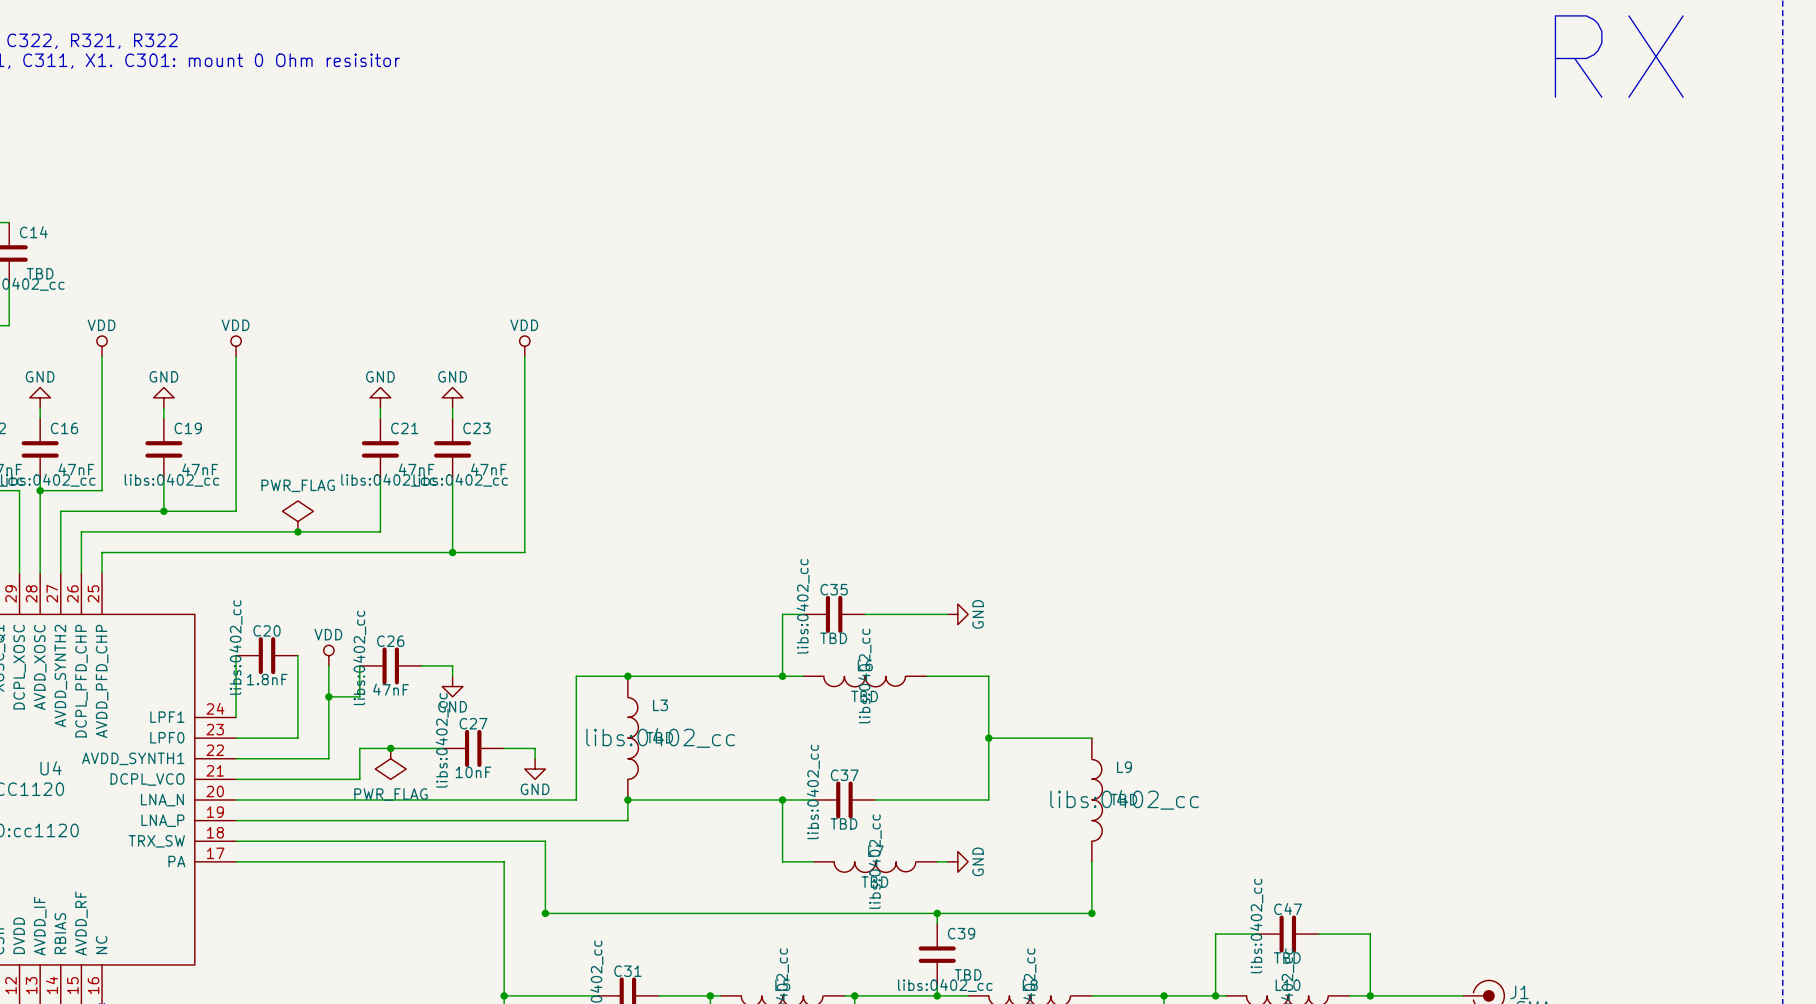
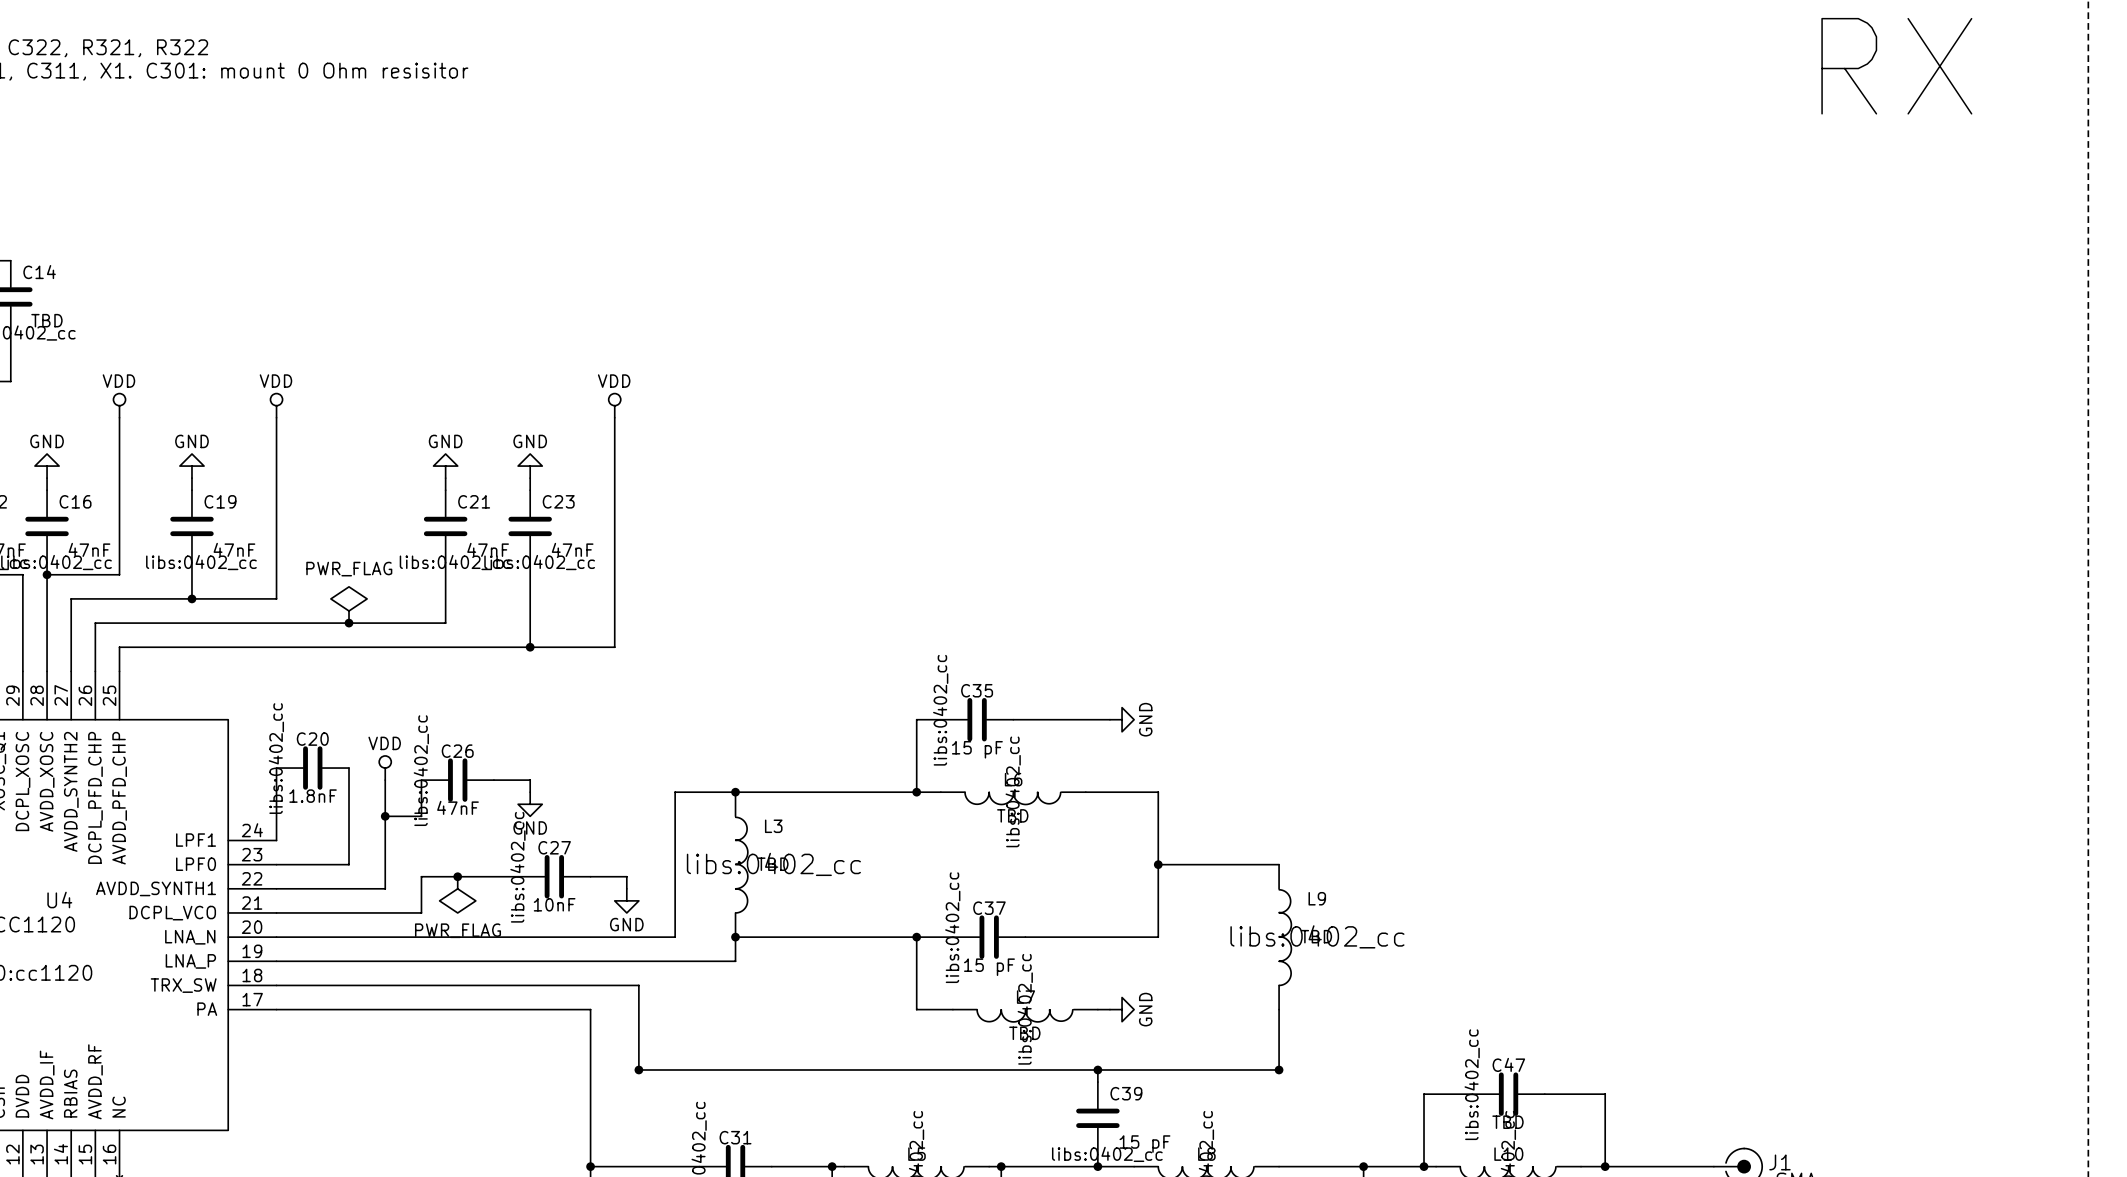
C35 value: TBD (833, 638) -> 15 pF (977, 749)
C37 value: TBD (843, 823) -> 15 pF (989, 967)
C39 value: TBD (968, 974) -> 15 pF (1144, 1144)

